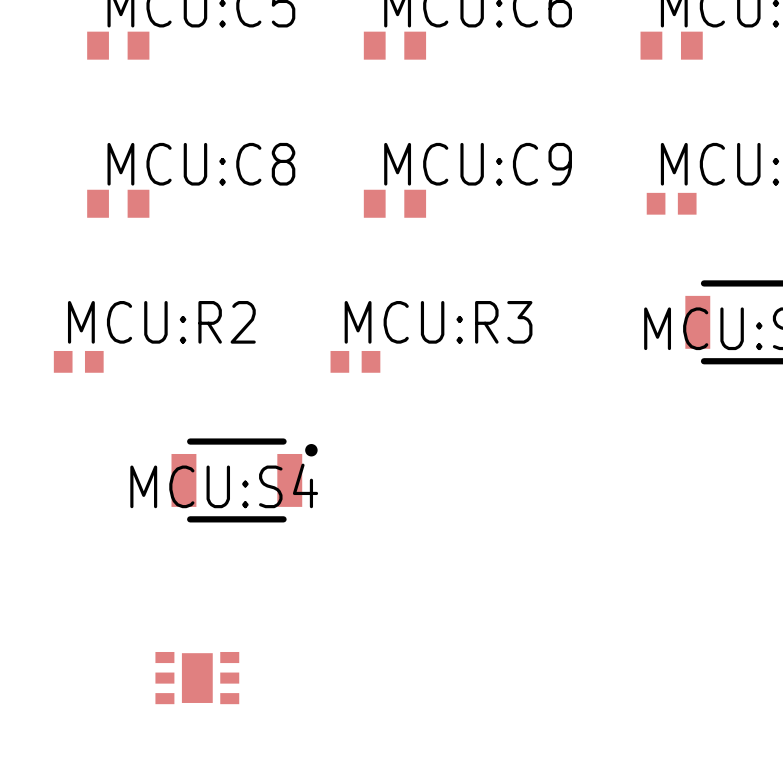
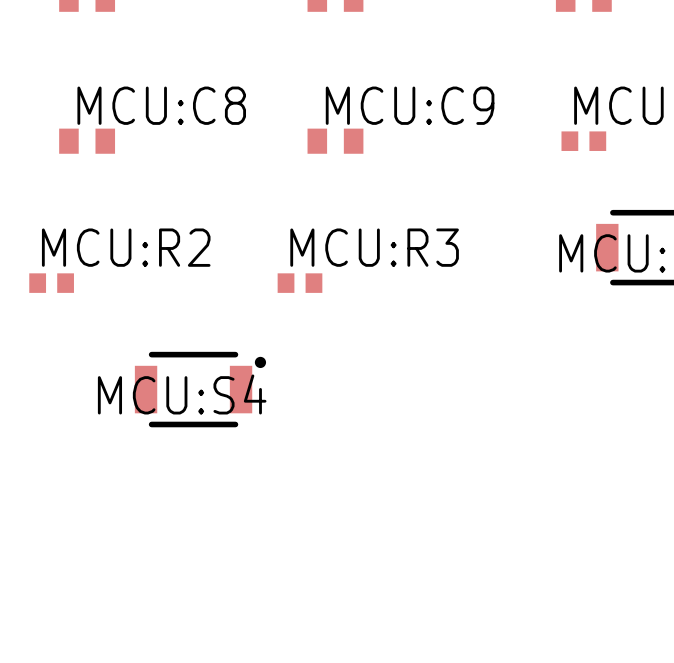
part: (197, 678) -> none

